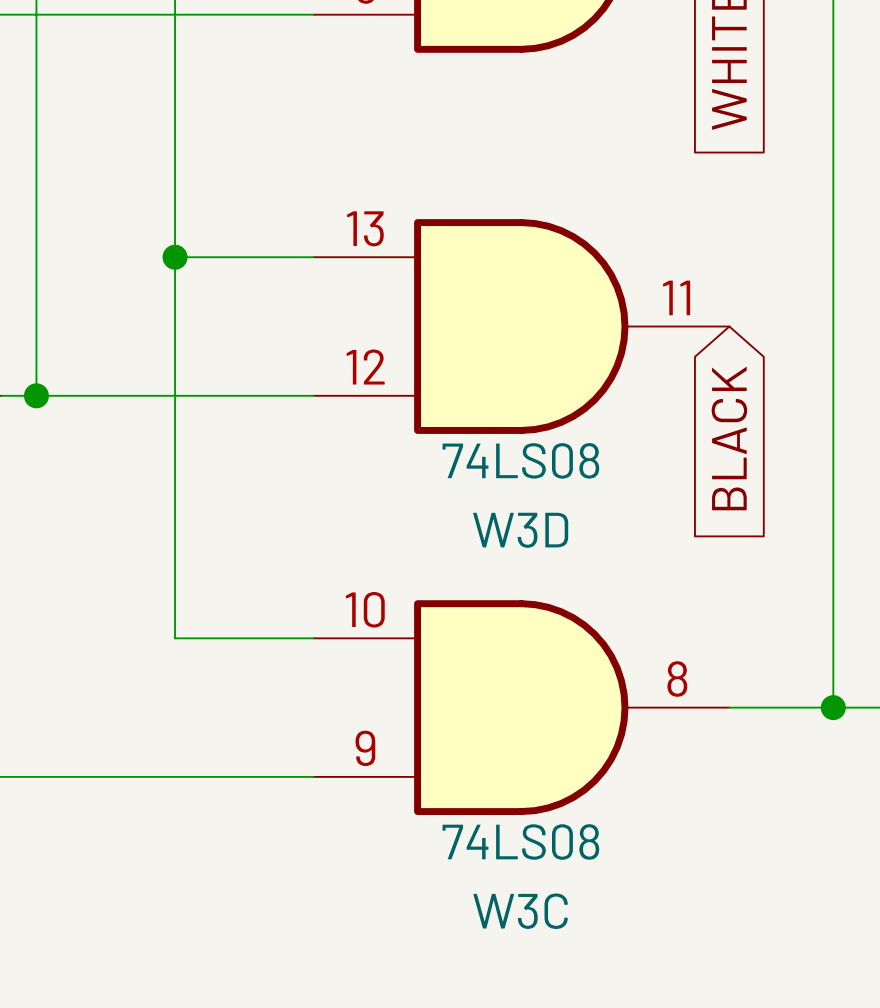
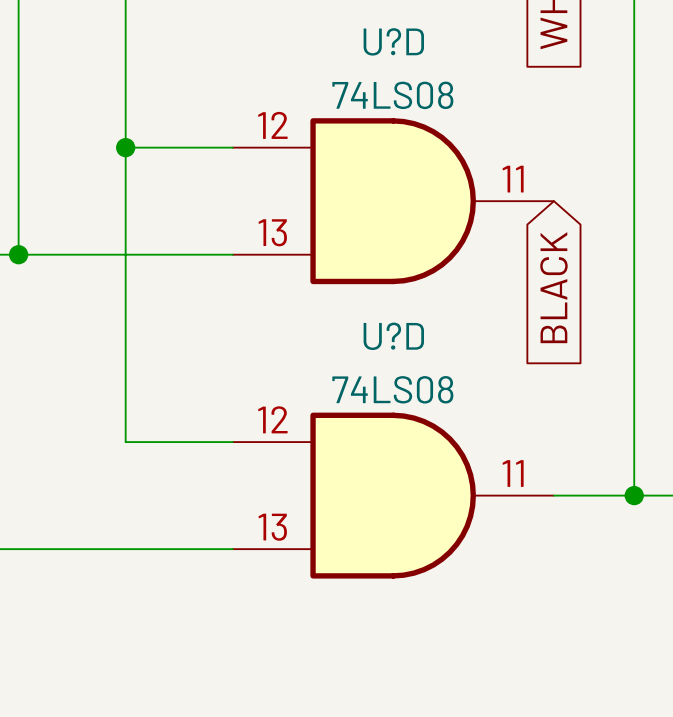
W3D flip: as is (521, 326) -> up-down (393, 201)
W3D name: W3D (520, 530) -> U?D (393, 41)
W3C pin number: 10 (365, 609) -> 12 (272, 419)
W3C pin number: 8 (677, 678) -> 11 (513, 473)
W3C pin number: 9 (365, 748) -> 13 (272, 527)
W3C value position: 74LS08 (520, 841) -> 74LS08 (392, 389)
W3C name: W3C (520, 911) -> U?D (393, 336)

